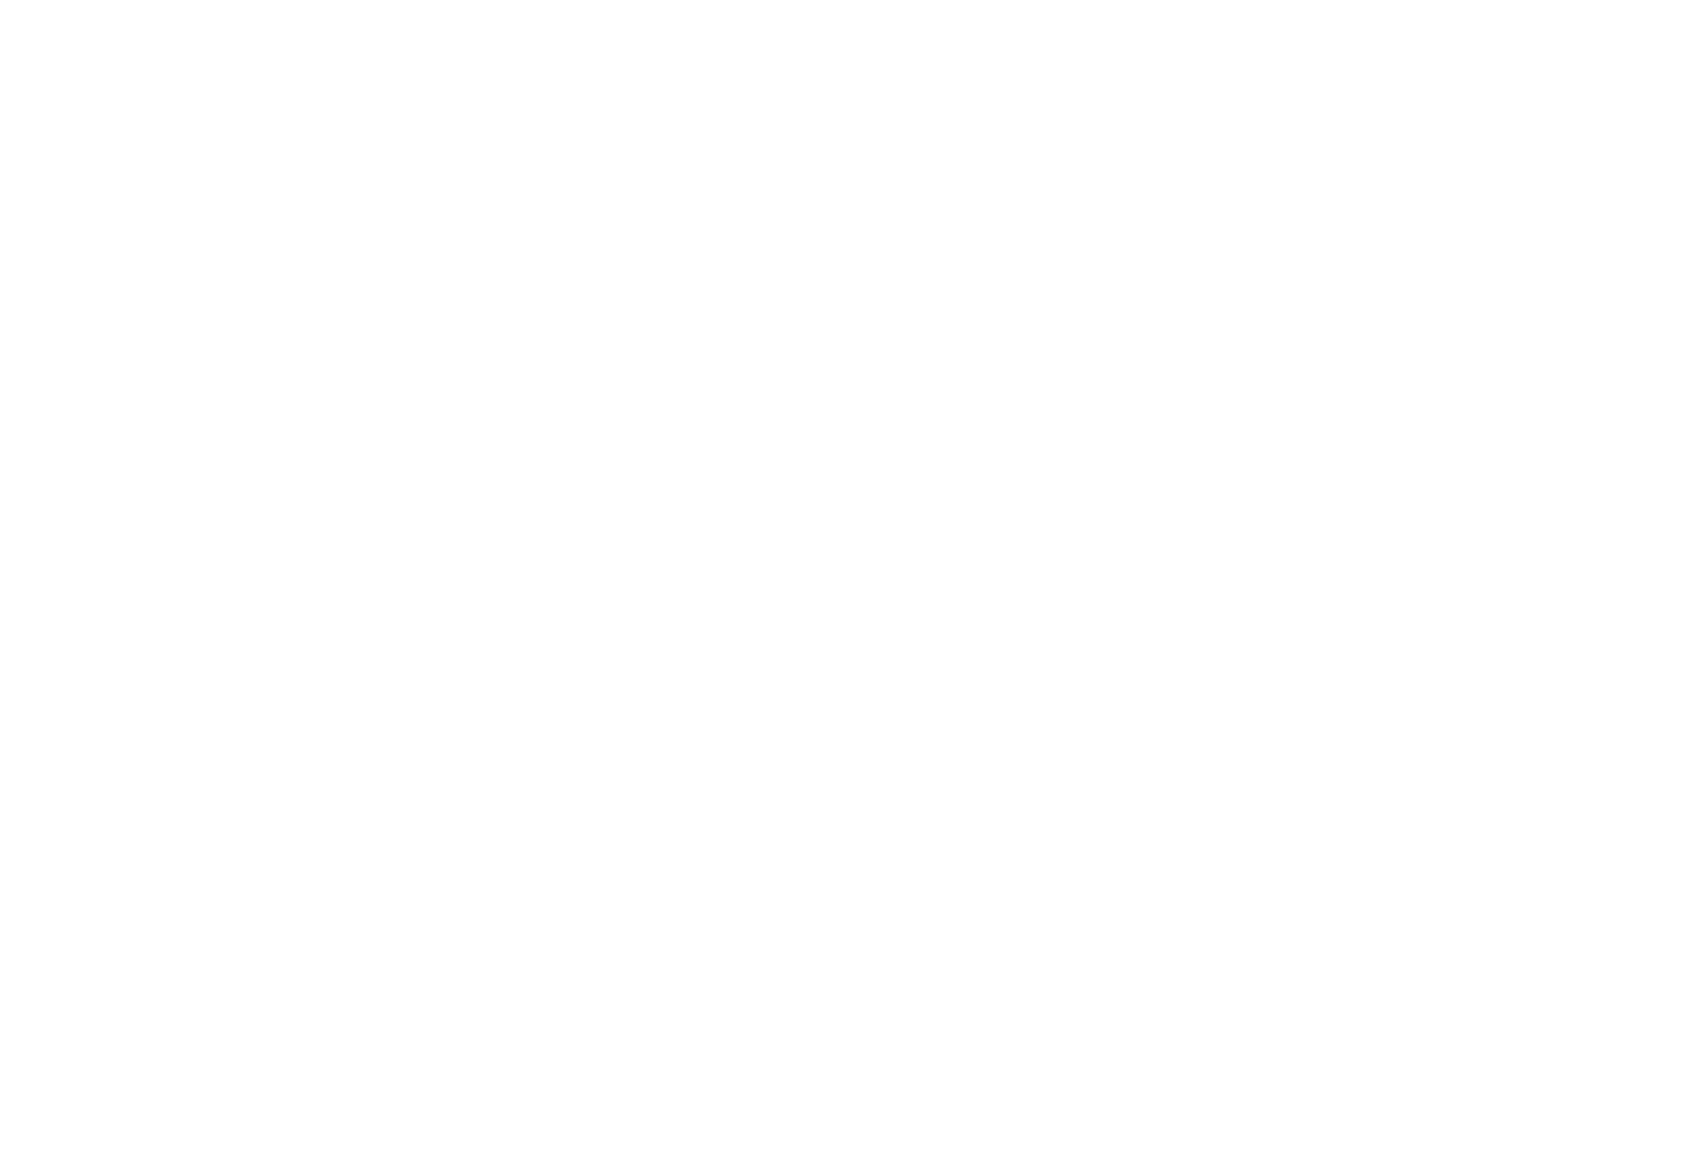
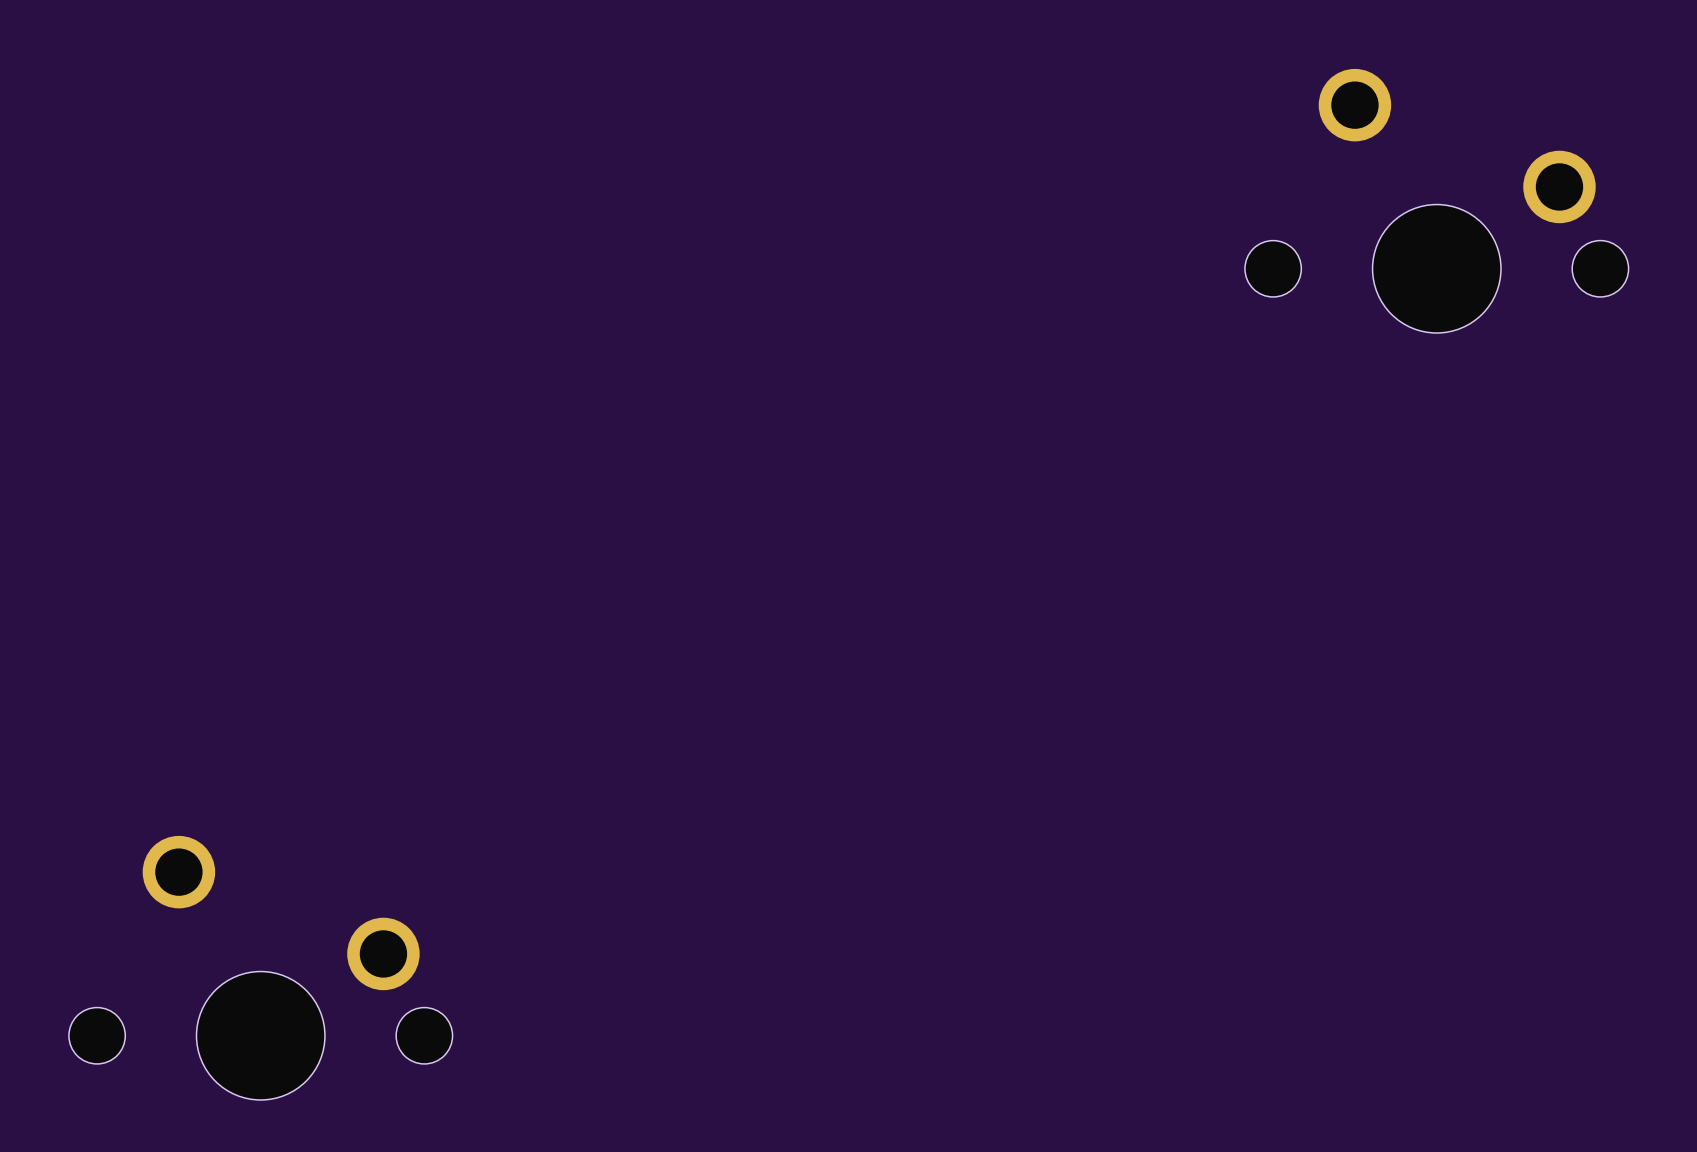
part: none -> (1436, 200)
part: none -> (260, 967)

